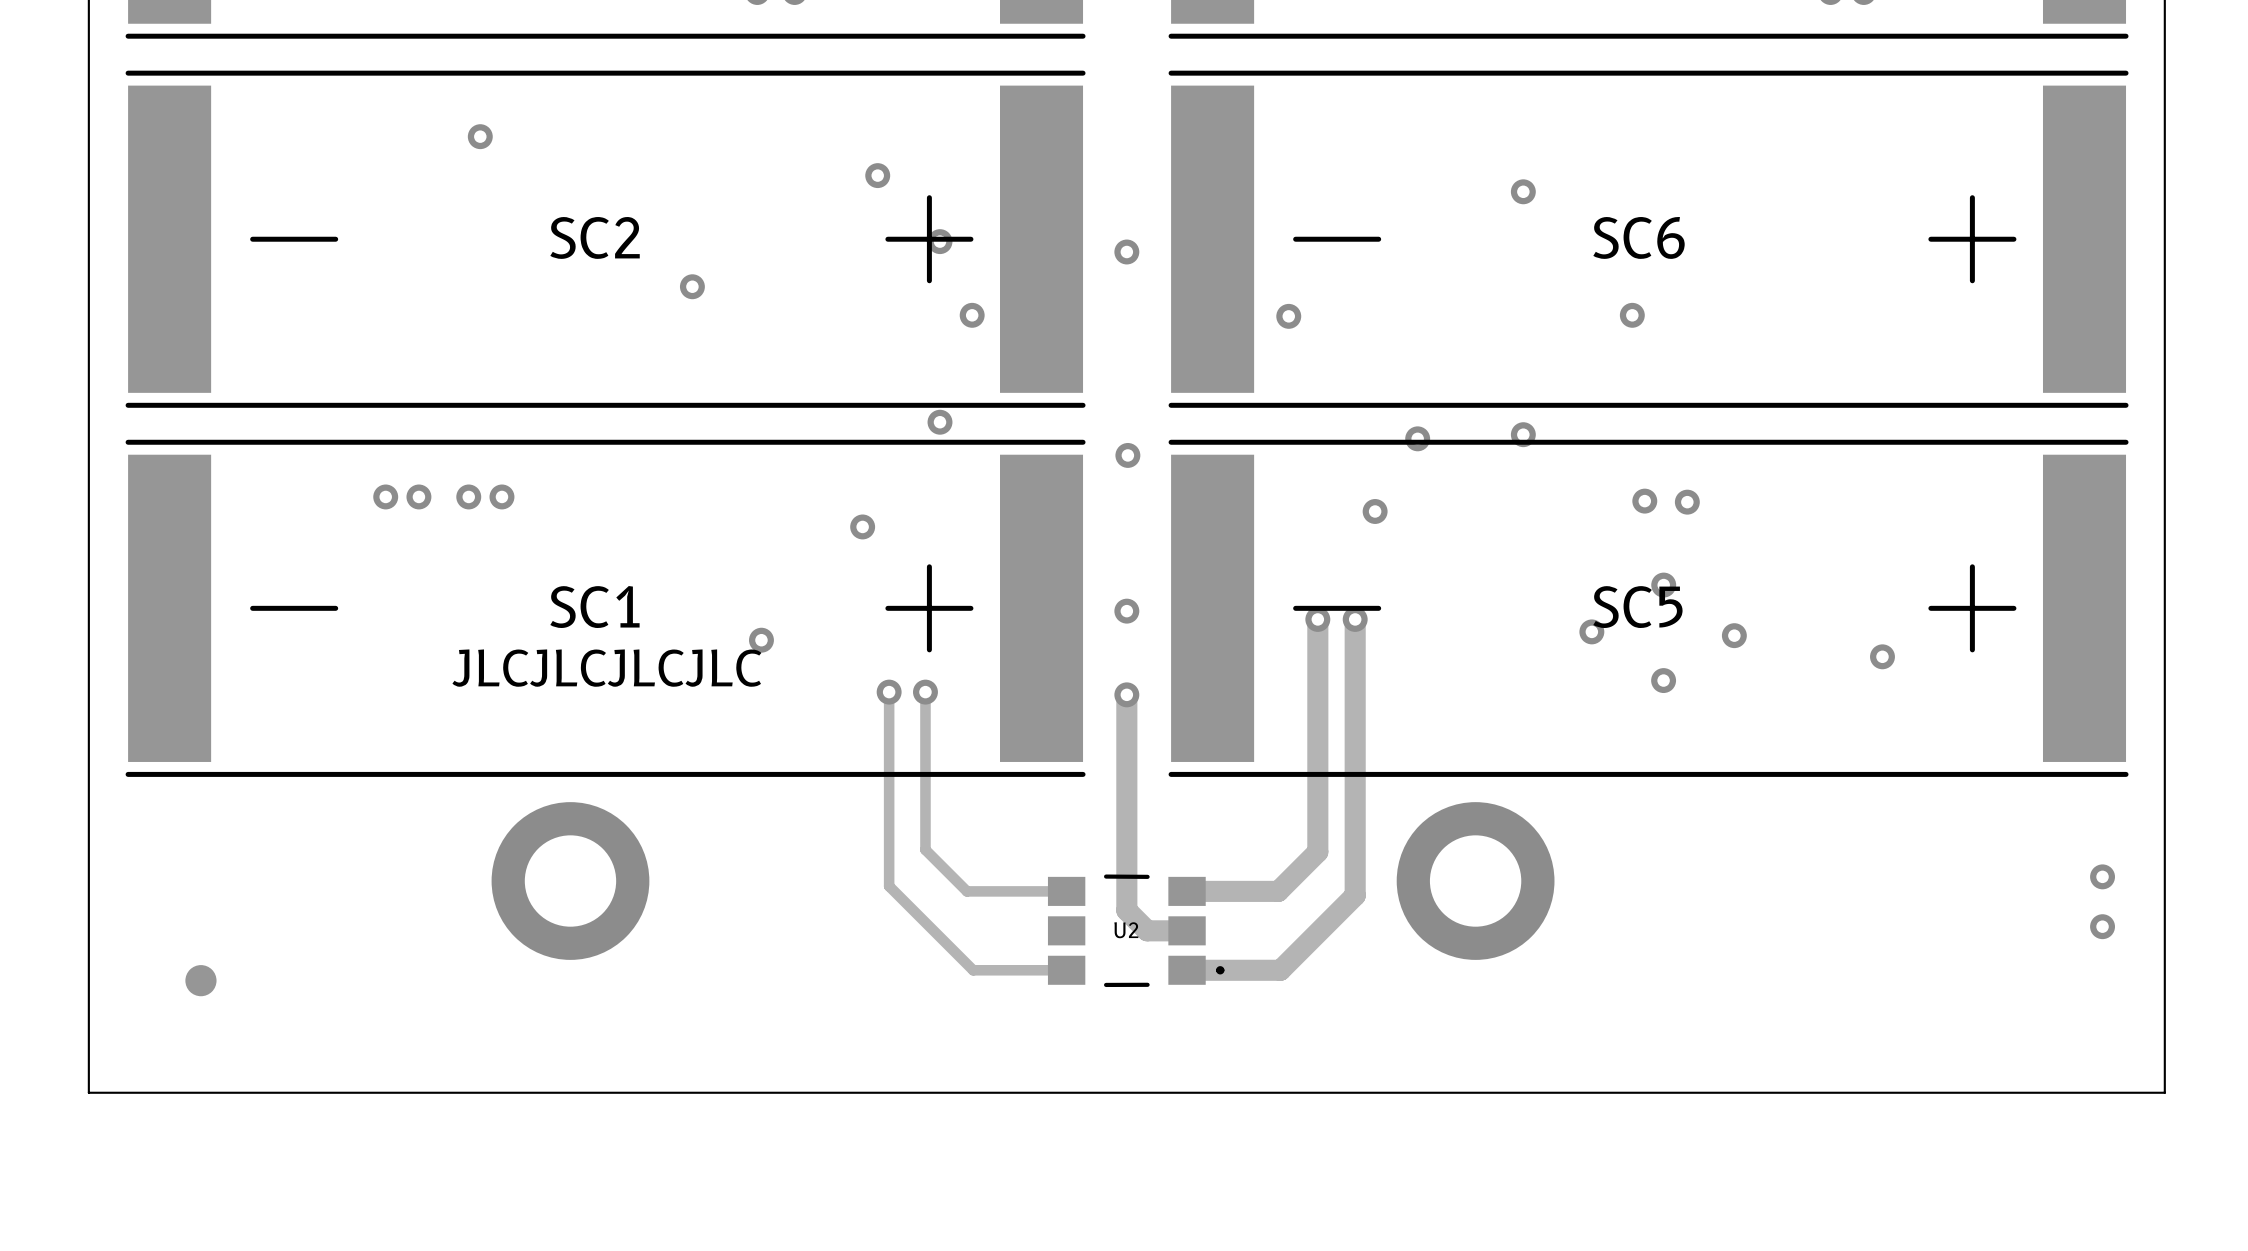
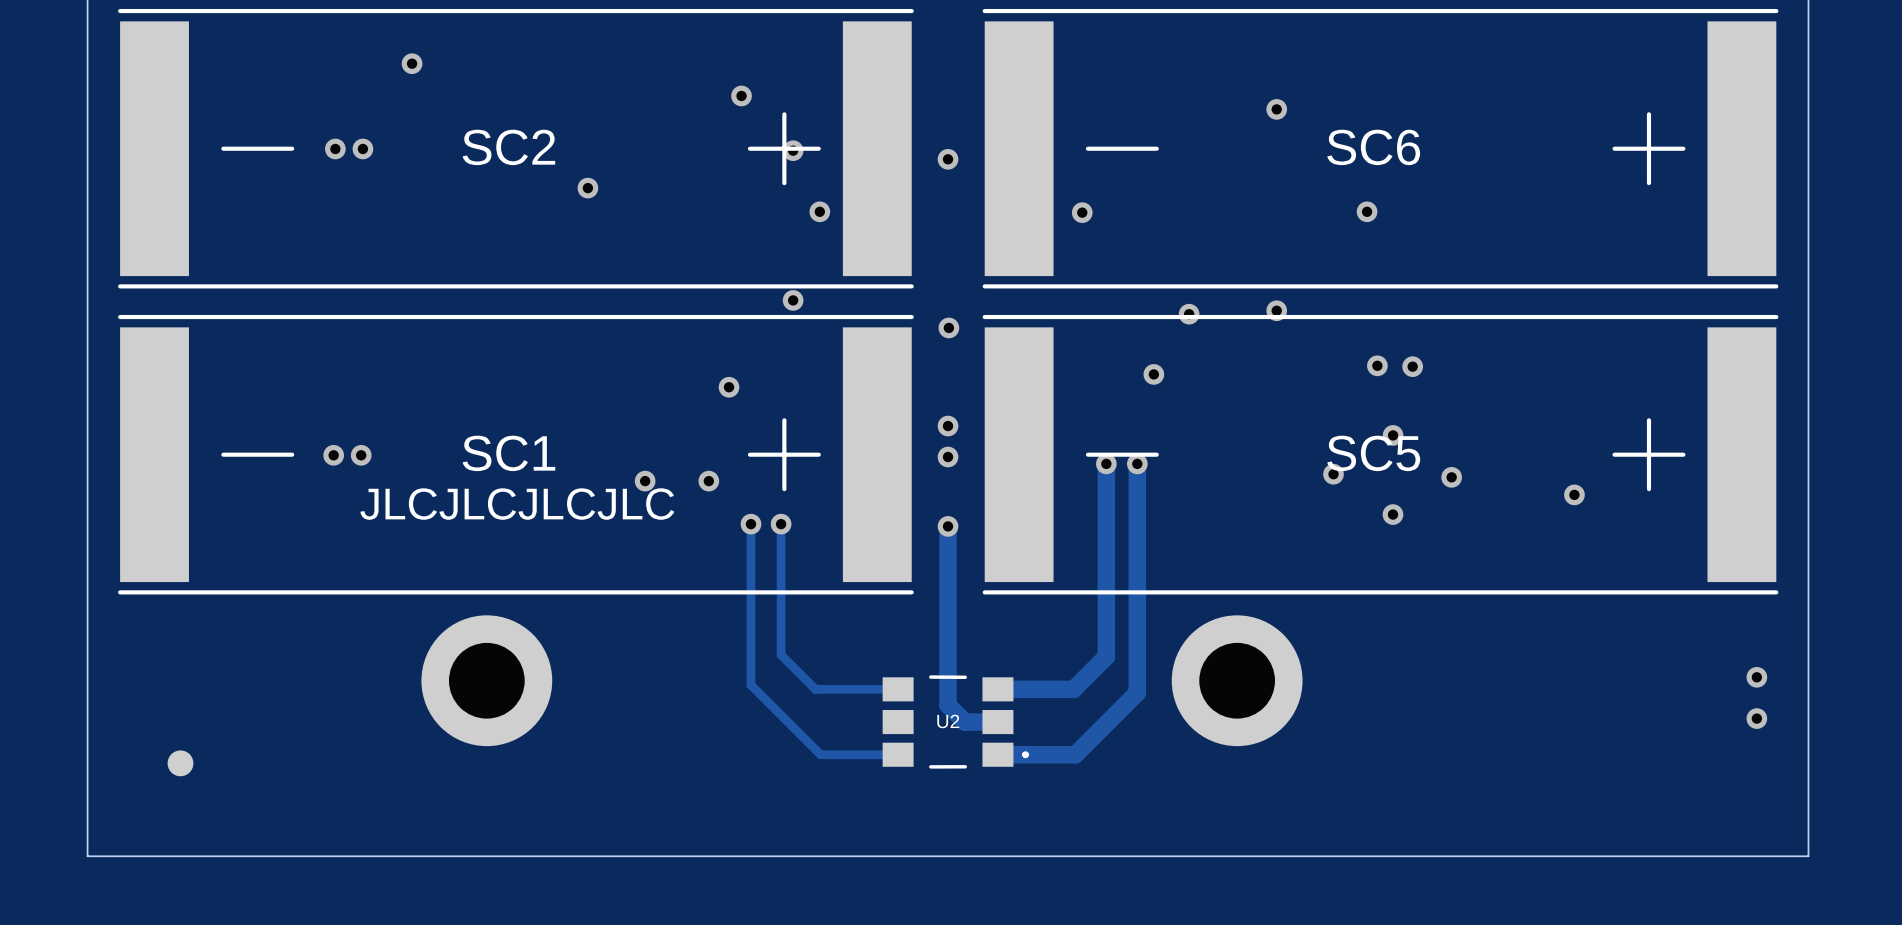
via: none -> (335, 148)
via: none -> (362, 148)
via: (385, 496) -> none
via: (418, 496) -> none
via: (468, 496) -> none
via: (501, 496) -> none
via: none -> (948, 426)
via: none -> (333, 455)
via: none -> (361, 455)
via: none -> (708, 481)

